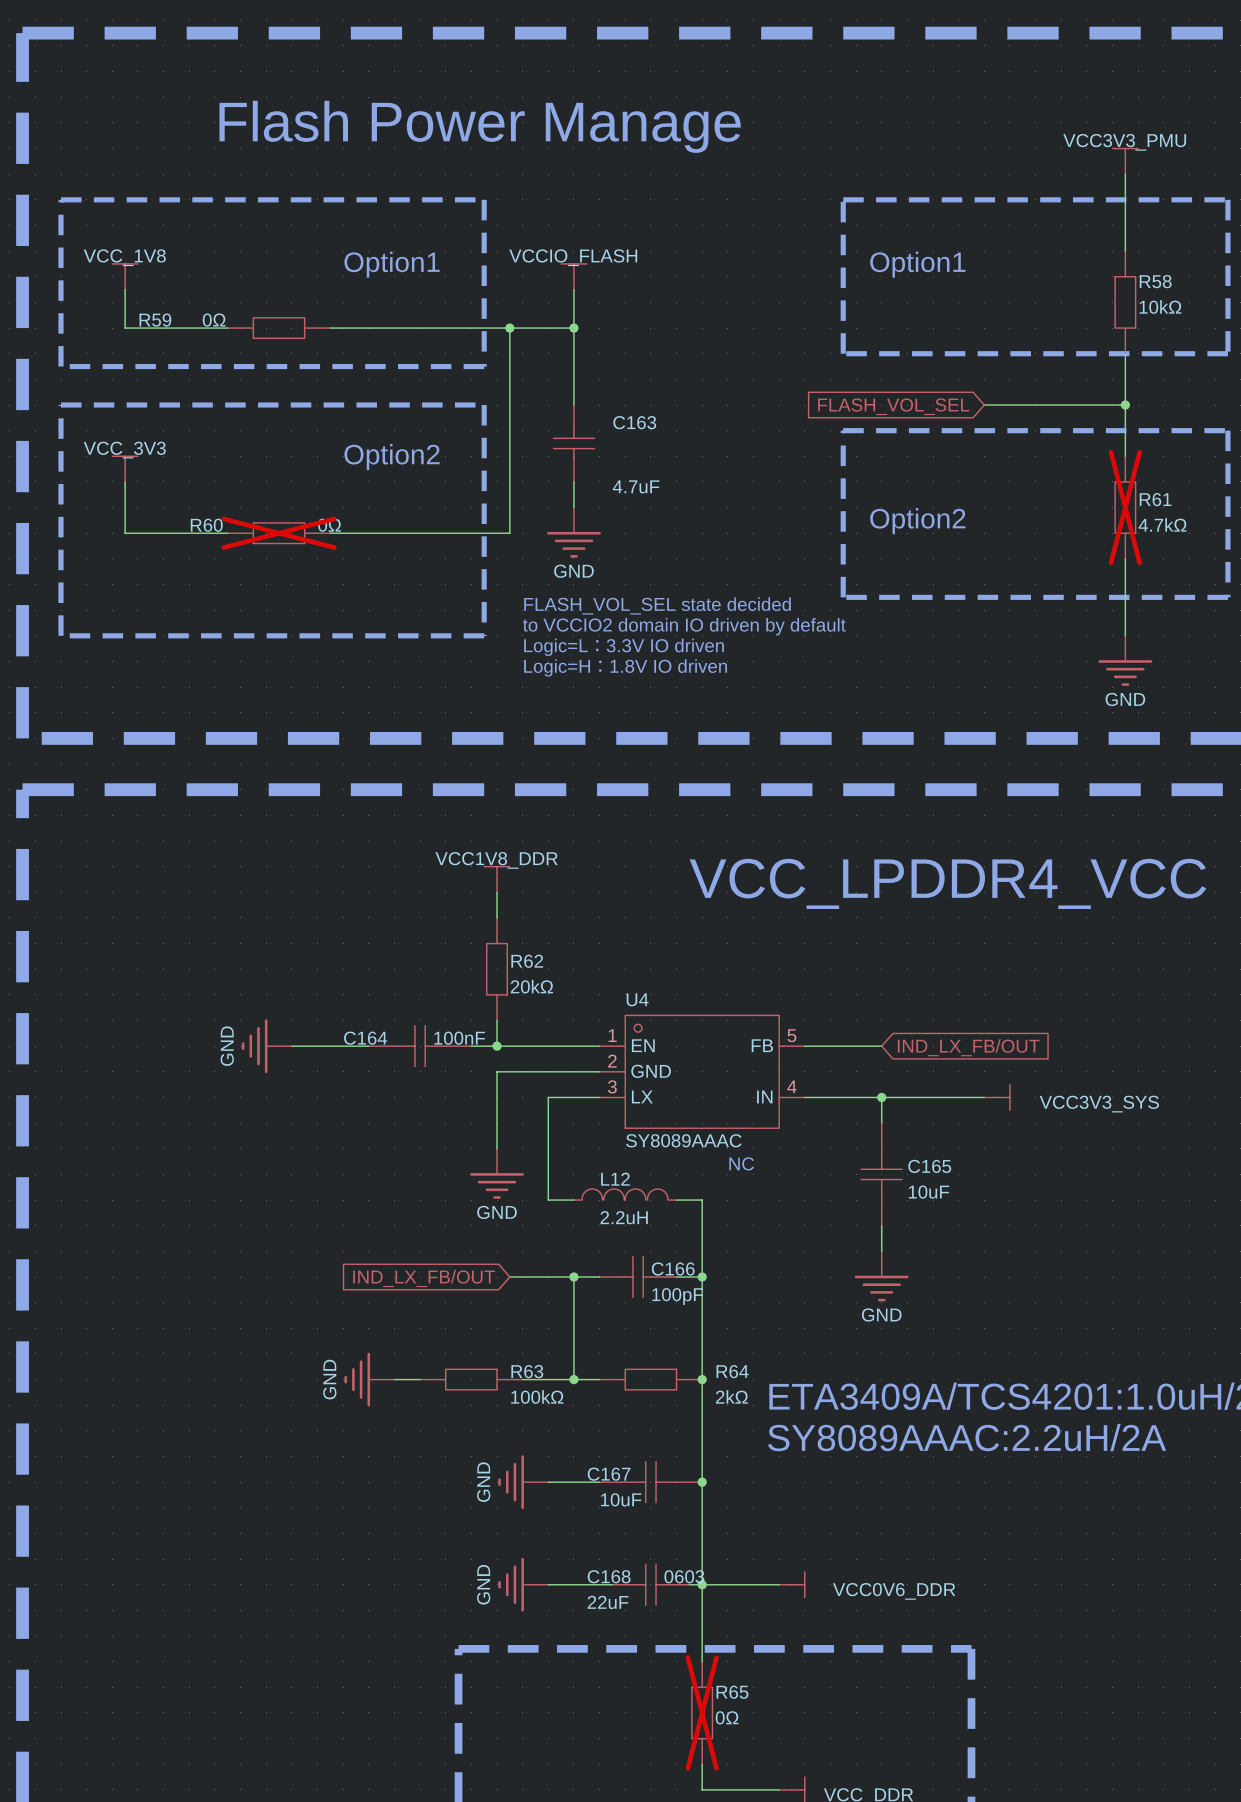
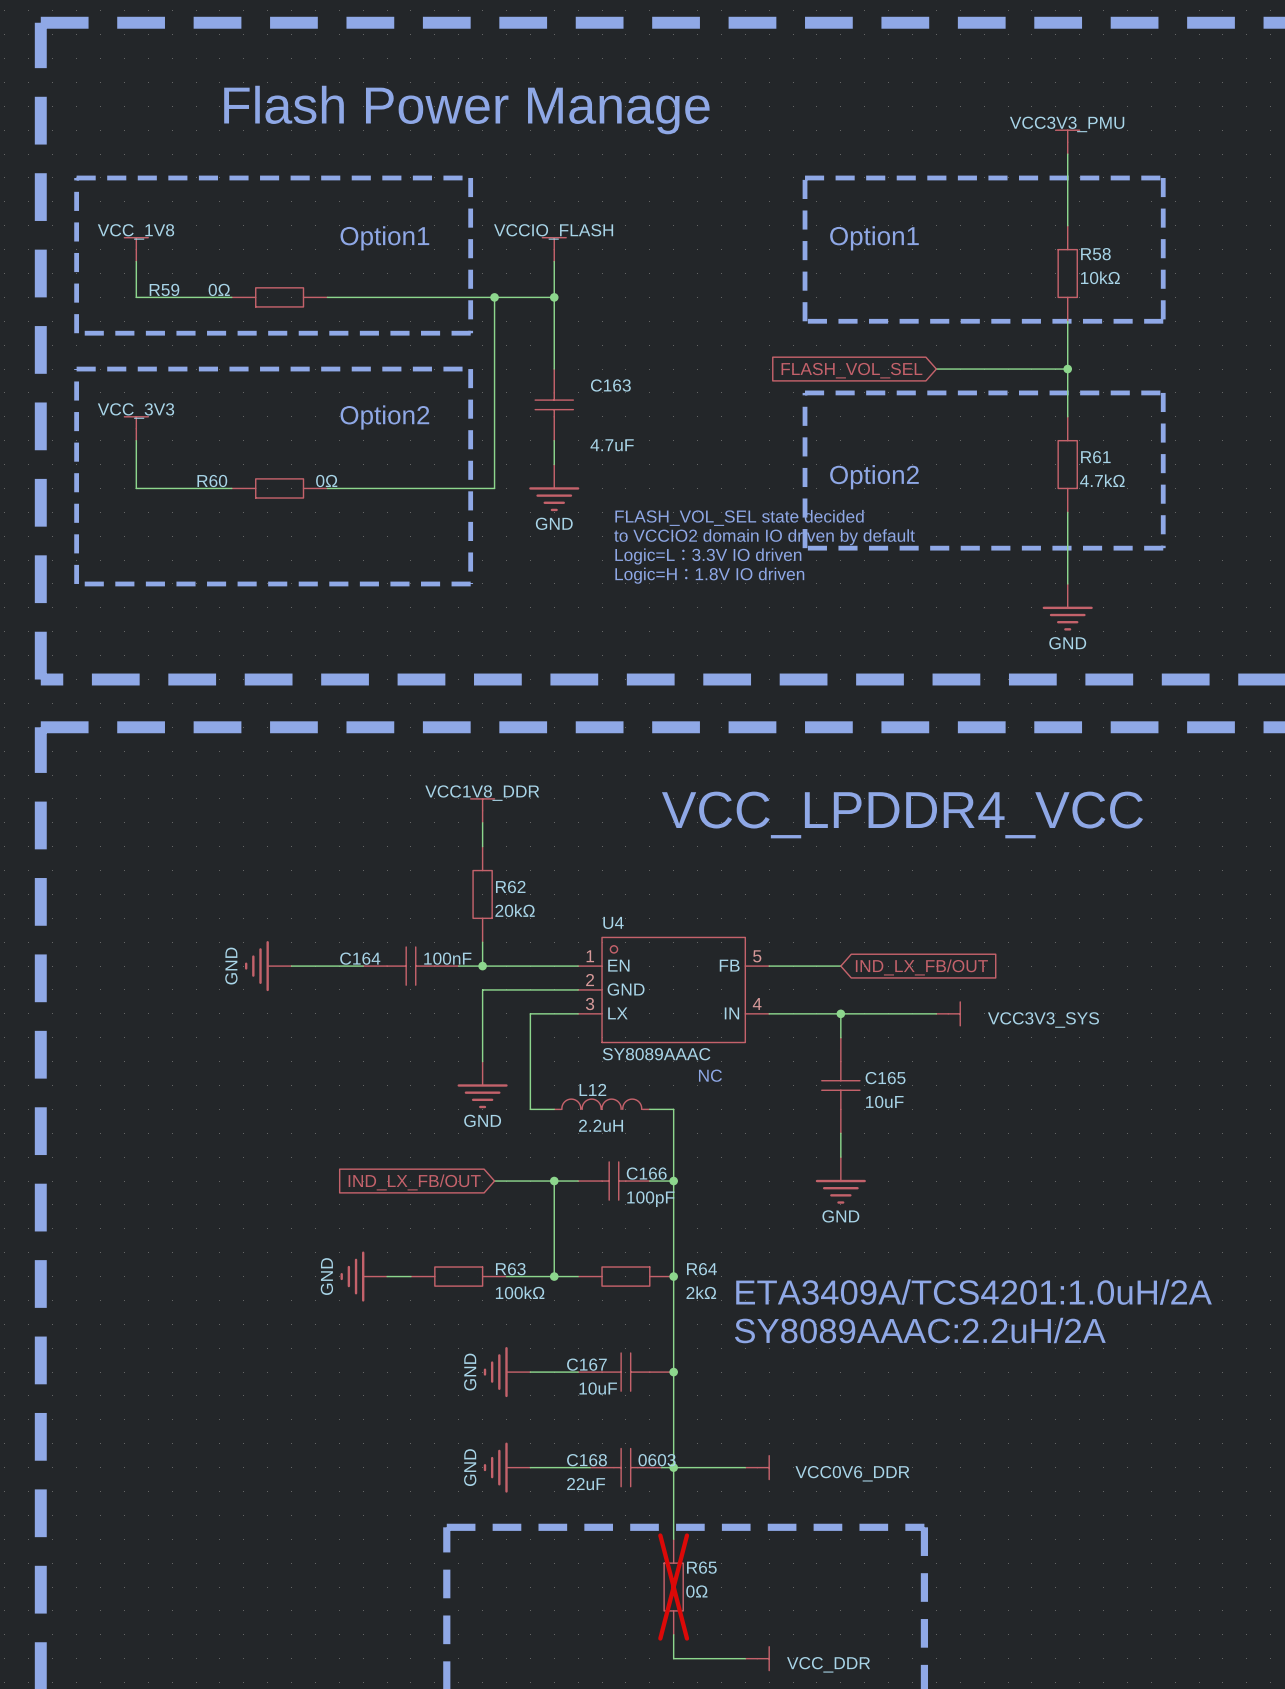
R61 do-not-place cross: (1125, 507) -> none
R60 do-not-place cross: (279, 533) -> none
text position: FLASH_VOL_SEL state decided (657, 605) -> FLASH_VOL_SEL state decided (739, 517)
text position: to VCCIO2 domain IO driven by default (684, 626) -> to VCCIO2 domain IO driven by default (764, 537)
text position: Logic=L：3.3V IO driven (624, 647) -> Logic=L：3.3V IO driven (708, 556)
text position: Logic=H：1.8V IO driven (625, 667) -> Logic=H：1.8V IO driven (709, 575)

